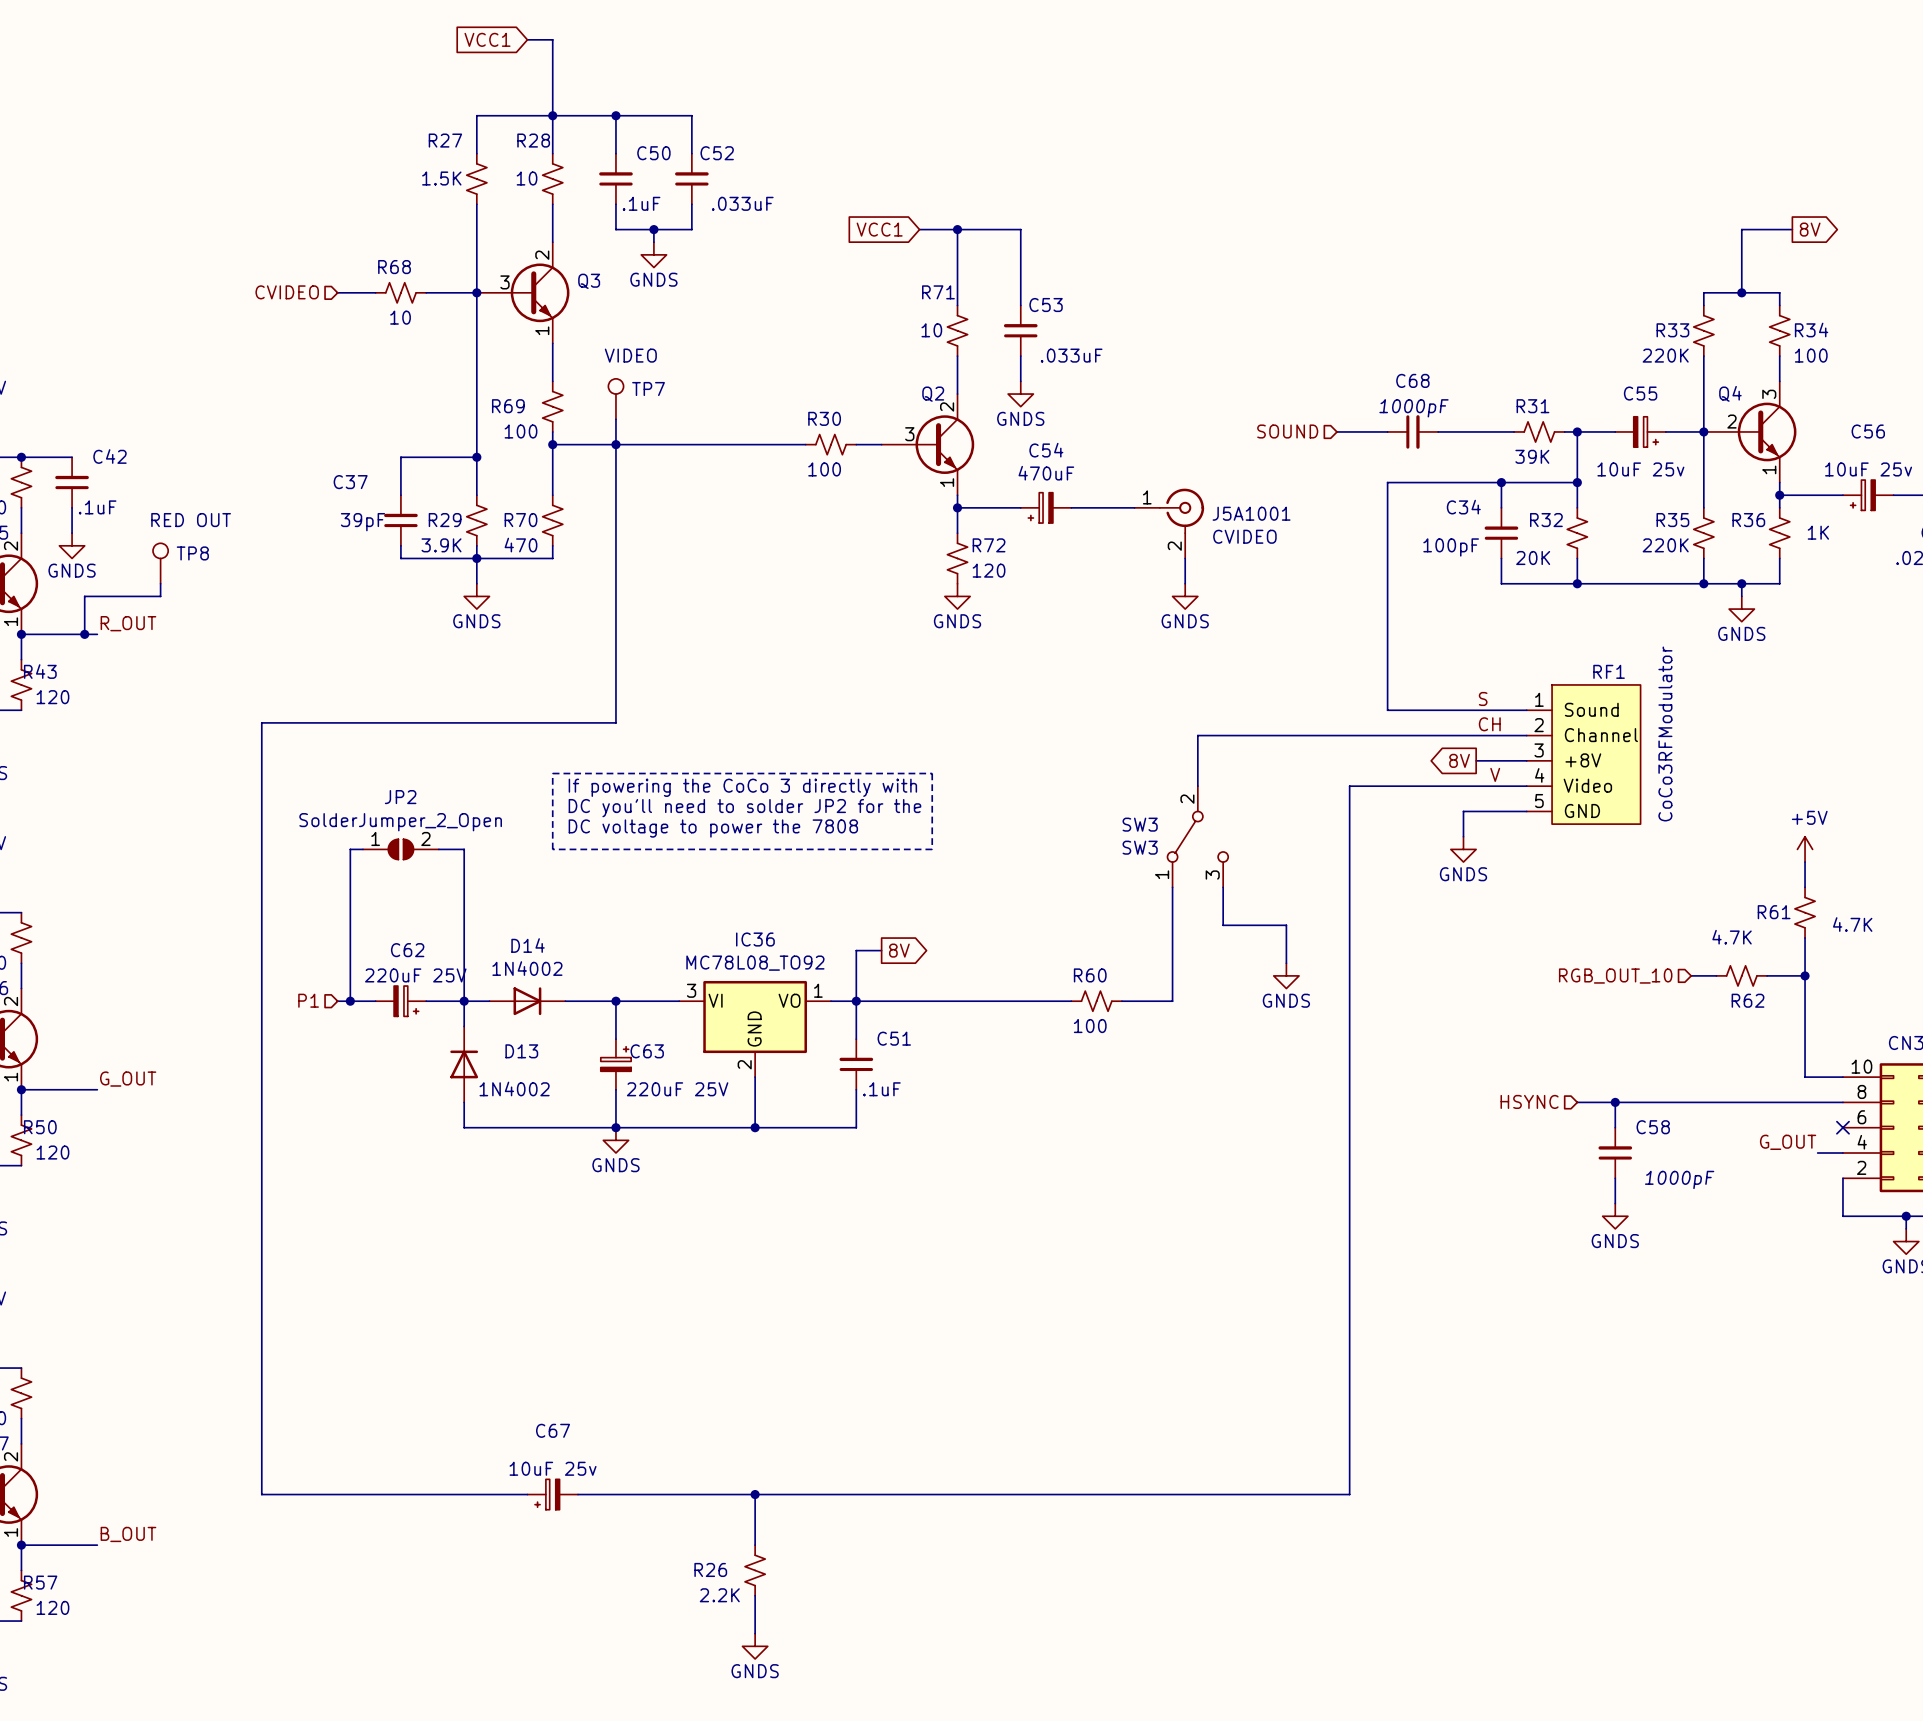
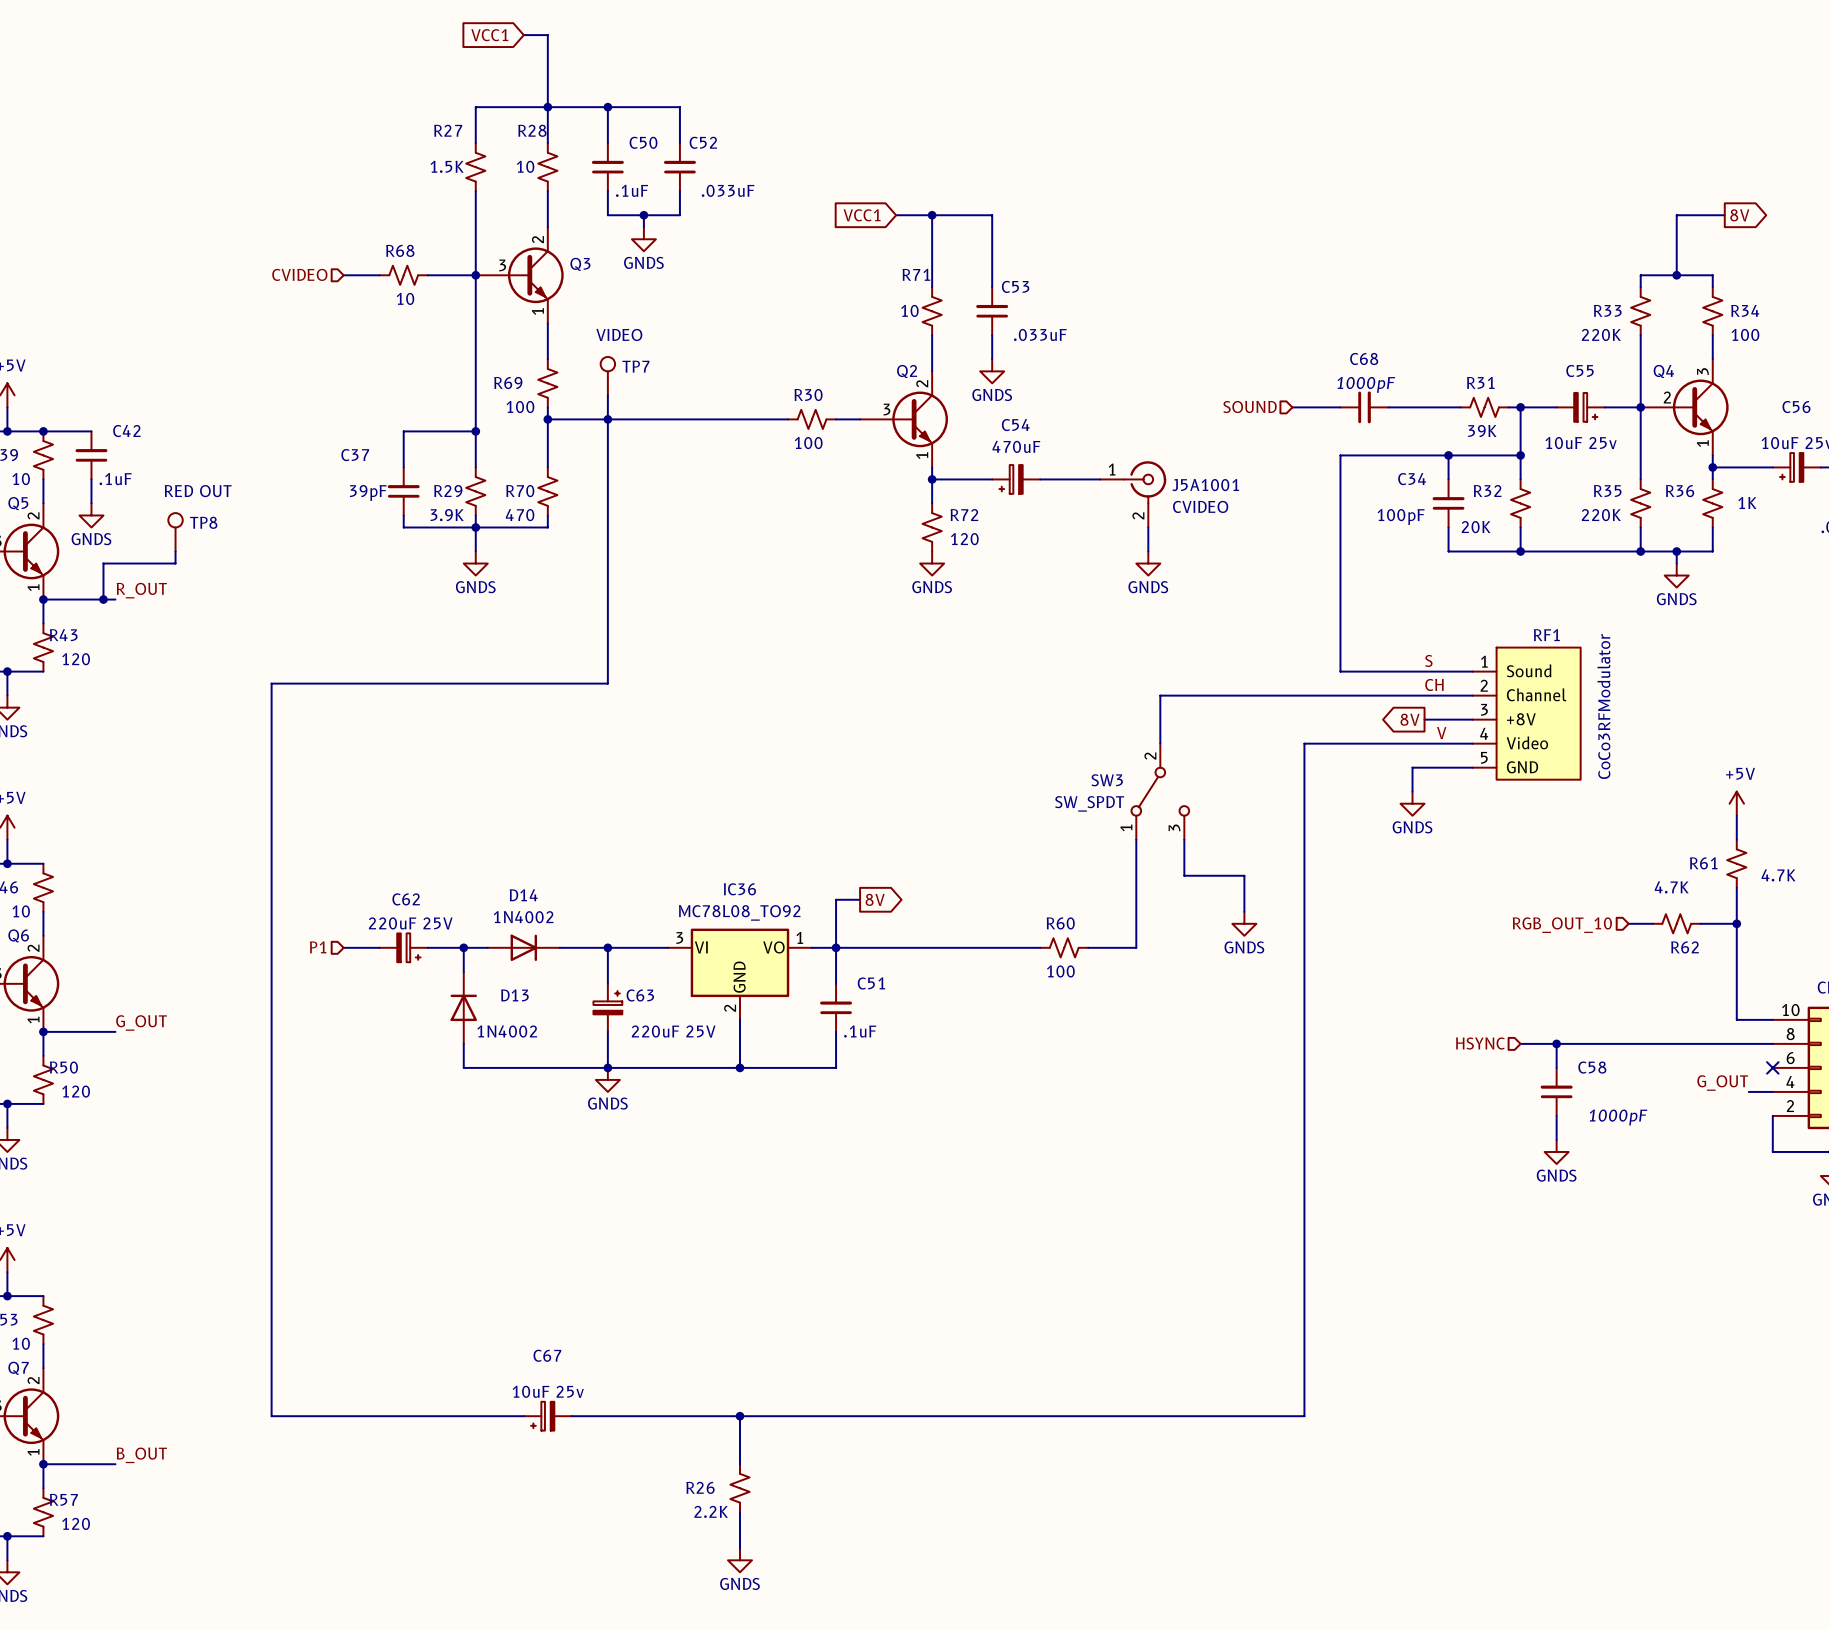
line: (552, 773) (932, 773) (932, 849) (552, 849) (552, 773) -> none
text: If powering the CoCo 3 directly with (742, 787) -> none
text: DC you'll need to solder JP2 for the (744, 808) -> none
text: DC voltage to power the 7808 (713, 828) -> none
SW3 value: SW3 (1140, 847) -> SW_SPDT (1089, 803)
wire: (362, 849) (350, 849) (350, 1001) -> none
JP2: SolderJumper_2_Open (400, 849) -> none
wire: (438, 849) (464, 849) (464, 1001) -> none
junction: (350, 1001) -> none

